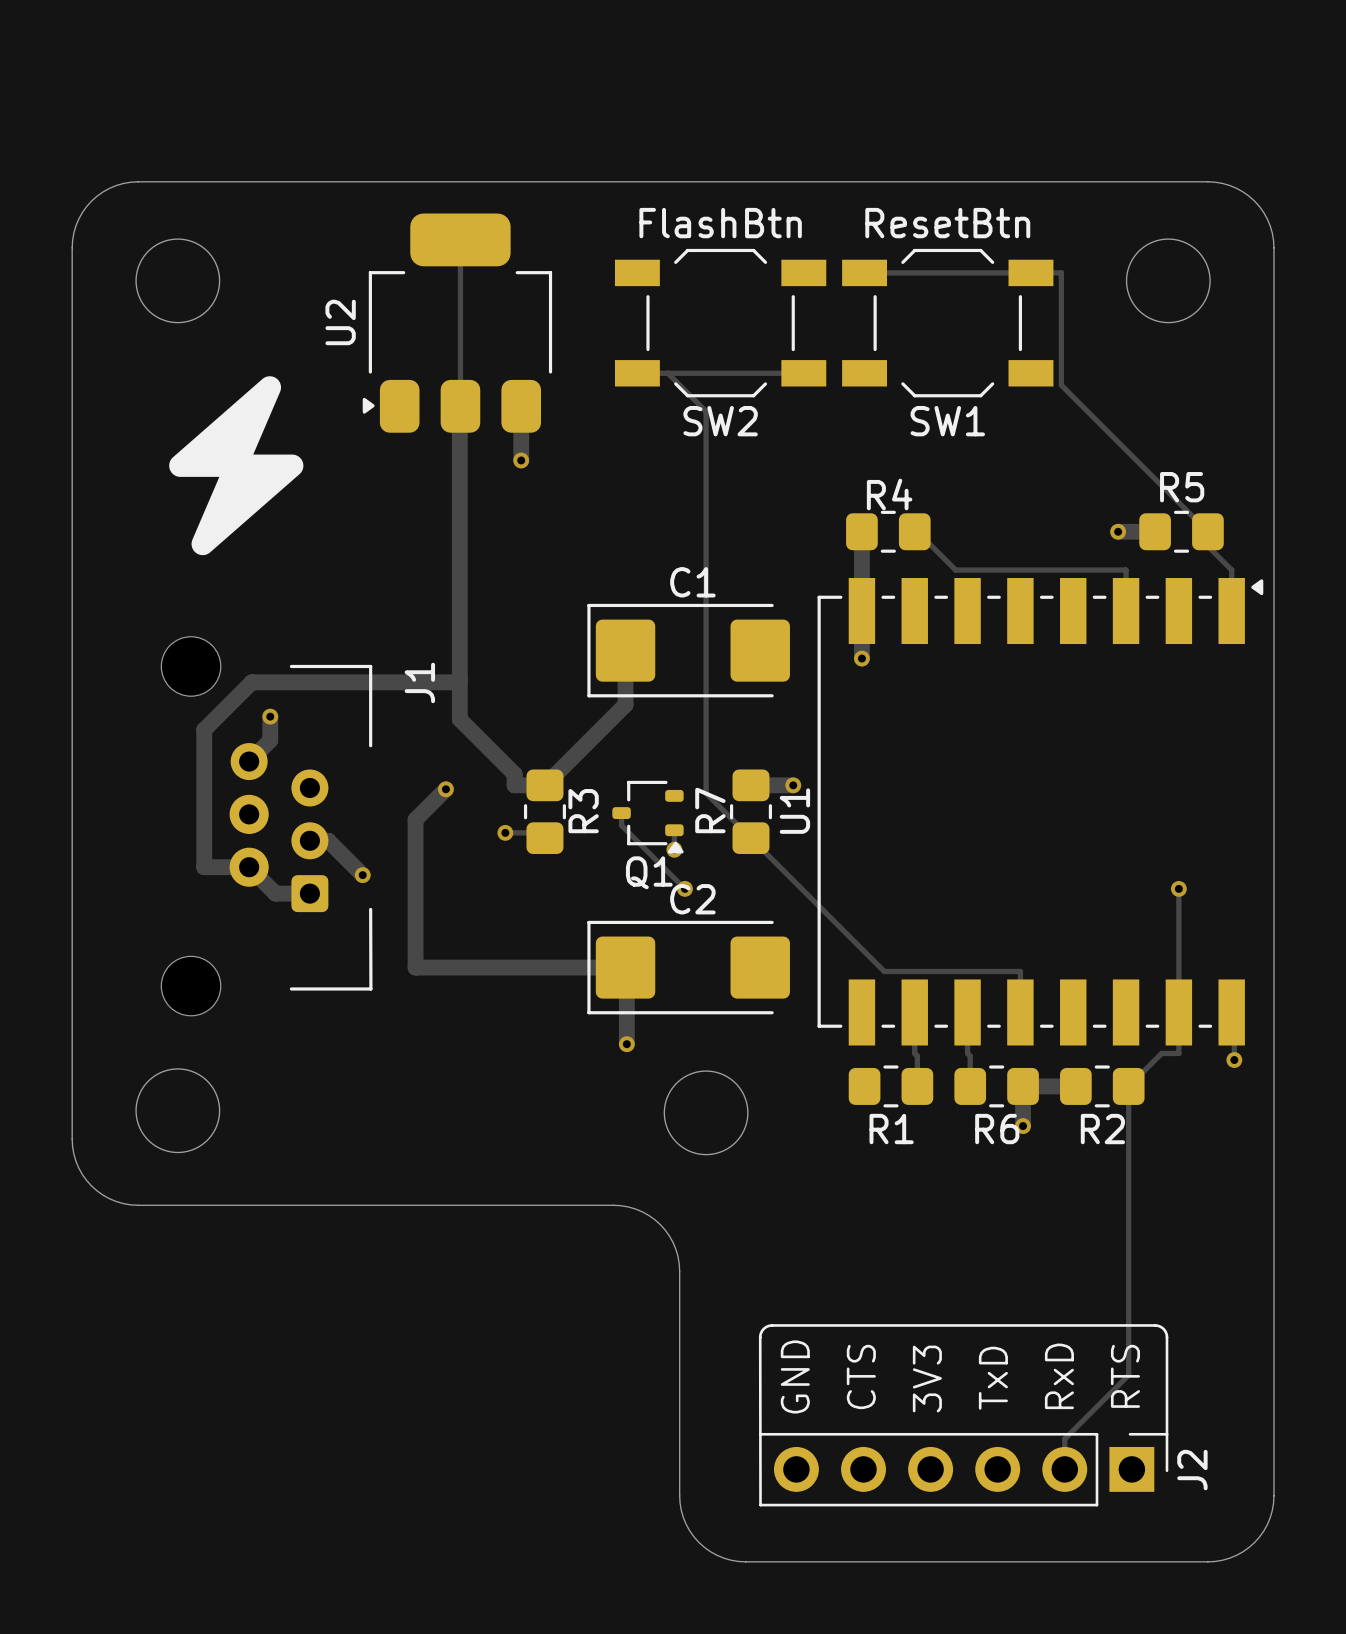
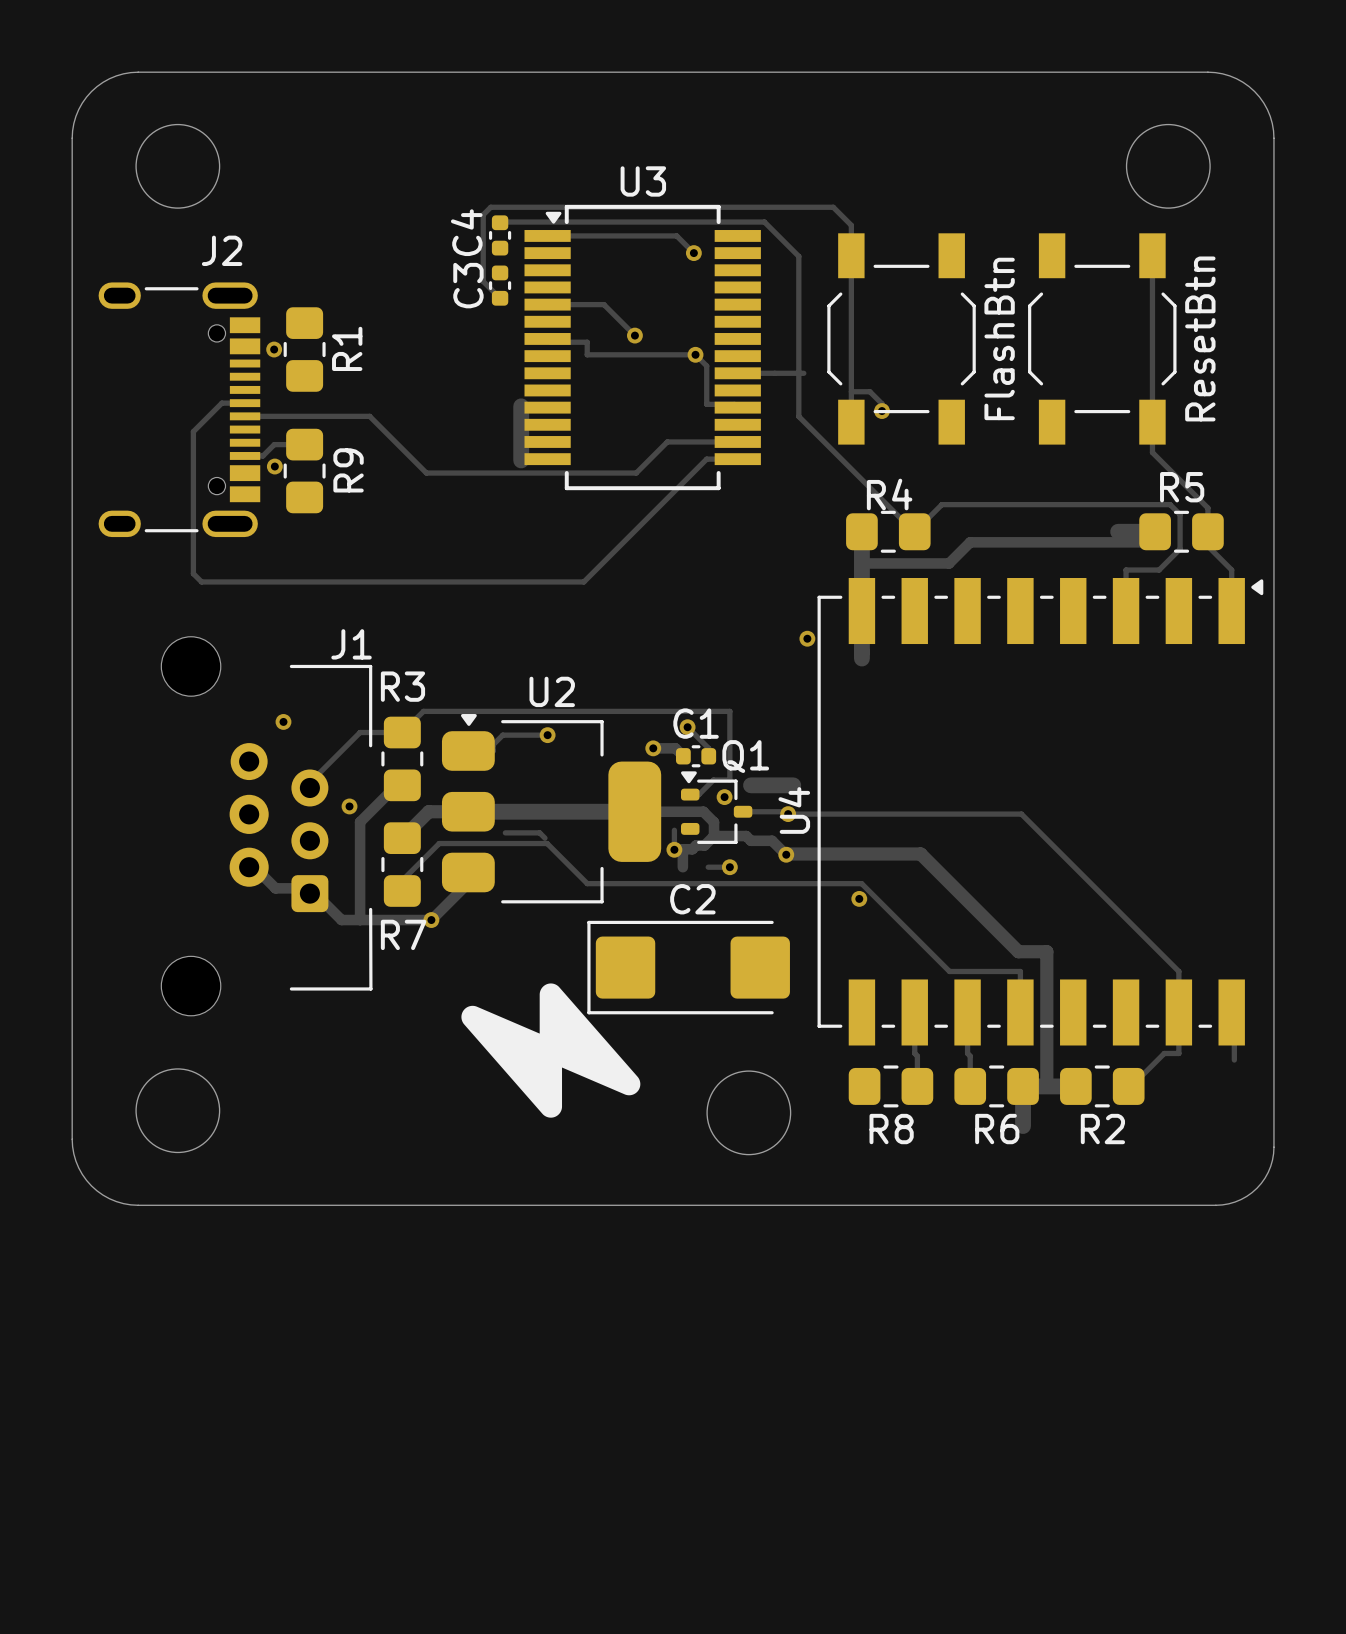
C4: none -> (500, 235)
track: none -> (547, 235) (676, 235) (693, 253)
track: (460, 239) (459, 719) (514, 774) (514, 785) (544, 785) (625, 704) (625, 650) -> none
board edge: (72, 247) (73, 233) (78, 219) (91, 201) (109, 188) (123, 183) (138, 181) (1215, 182) (1236, 188) (1254, 201) (1267, 219) (1272, 233) (1273, 247) -> (72, 247) (72, 138) (75, 116) (86, 97) (97, 86) (116, 75) (138, 72) (1215, 72) (1229, 75) (1249, 86) (1263, 103) (1270, 116) (1273, 138) (1273, 247)
via: none -> (693, 253)
track: (864, 272) (1061, 272) (1061, 385) (1207, 531) -> (1152, 255) (1152, 452) (1207, 508) (1207, 531)
round board edge position: (177, 280) -> (177, 166)
round board edge position: (1168, 280) -> (1168, 166)
C3: none -> (500, 285)
track: none -> (500, 298) (483, 281) (483, 214) (490, 207) (833, 207) (851, 225) (851, 422)
track: none -> (547, 304) (603, 304) (634, 335)
U2 rotation: 0° (457, 323) -> 90° clockwise (551, 808)
U2 position: (457, 323) -> (551, 808)
SW2: FlashBtn (720, 323) -> none
SW1: ResetBtn (947, 323) -> none
via: none -> (634, 335)
track: none -> (547, 338) (550, 342) (587, 342) (587, 354) (695, 354) (706, 366) (706, 404) (734, 404) (737, 407)
part: none -> FlashBtn (901, 338)
part: none -> ResetBtn (1102, 338)
U3: none -> (642, 347)
via: none -> (274, 349)
R1: none -> (304, 349)
via: none -> (695, 354)
track: (637, 373) (737, 373) -> none
track: (667, 373) (706, 411) (706, 793) (884, 971) (949, 971) -> (402, 890) (402, 880) (439, 843) (547, 843) (587, 883) (861, 883) (949, 971)
drawing: [169, 376, 304, 556] -> none
track: none -> (851, 391) (869, 391) (882, 403) (882, 411)
track: none -> (245, 403) (221, 403) (193, 431) (193, 573) (201, 581) (583, 581) (706, 459) (737, 459)
via: none -> (882, 411)
track: none -> (245, 416) (369, 416) (426, 473) (636, 473) (667, 441) (737, 441)
track: none -> (304, 444) (274, 444) (262, 455) (245, 455)
via: (521, 460) -> none
via: none -> (274, 466)
R9: none -> (304, 471)
track: (917, 531) (955, 570) (1126, 570) -> (500, 222) (764, 222) (798, 256) (798, 416) (914, 531) (941, 504) (1170, 504) (1180, 514) (1180, 549) (1159, 570) (1126, 570)
via: (1118, 531) -> none
track: none -> (1155, 531) (1144, 542) (970, 542) (949, 563) (861, 563)
C1 footprint: [587, 603, 790, 698] -> [675, 745, 717, 768]
via position: (861, 658) -> (807, 638)
track: (459, 679) (457, 682) (251, 682) (204, 729) (204, 867) (249, 867) (275, 893) (309, 893) -> none
J1 name rotation: 0° (419, 682) -> 90° clockwise (351, 644)
J1 name position: J1 (419, 682) -> J1 (351, 644)
track: (270, 716) (270, 740) (249, 761) -> none
via position: (270, 716) -> (283, 721)
track: none -> (687, 727) (708, 748) (708, 756)
via: none -> (687, 727)
track: none -> (547, 735) (502, 735) (493, 744) (493, 750) (468, 750)
via: none -> (547, 735)
track: none -> (653, 748) (675, 748) (683, 756) (678, 751)
via: none -> (653, 748)
track: none -> (406, 781) (402, 785) (396, 785) (360, 822) (360, 920)
track: none -> (309, 782) (360, 732) (402, 732) (423, 711) (729, 711) (729, 780) (713, 780) (698, 794) (690, 794)
via position: (793, 785) -> (788, 814)
track: (445, 789) (415, 819) (415, 967) (625, 967) (626, 1044) -> none
via: (445, 789) -> none
via: none -> (724, 797)
via: none -> (349, 806)
R7 name rotation: 0° (710, 810) -> 90° clockwise (403, 934)
R7 name position: R7 (710, 810) -> R7 (403, 934)
R3 position: (544, 811) -> (402, 758)
R3 name rotation: 0° (583, 811) -> 90° clockwise (402, 686)
R3 name position: R3 (583, 811) -> R3 (402, 686)
R7 position: (750, 811) -> (402, 864)
U1 name: U1 (794, 811) -> U4 (794, 810)
track: (621, 813) (621, 825) (684, 888) -> none
Q1 rotation: 0° (647, 817) -> 180° (716, 807)
Q1 position: (647, 817) -> (716, 807)
via: (505, 832) -> none
track: none -> (714, 836) (704, 845) (696, 845) (692, 849) (682, 849) (682, 867)
track: none -> (714, 836) (714, 822) (703, 811) (428, 811) (402, 838)
track: none -> (714, 836) (746, 836) (750, 840) (772, 840) (786, 854) (920, 854) (1018, 951) (1046, 951) (1046, 1081) (1042, 1086)
track: (309, 840) (328, 840) (362, 875) -> none
via: none -> (786, 854)
track: none -> (249, 861) (275, 888) (309, 888) (341, 920) (431, 920) (468, 883) (468, 872)
track: none -> (708, 867) (729, 867)
via: none -> (729, 867)
via: (362, 875) -> none
via: (684, 888) -> none
track: (1178, 888) (1178, 971) -> (743, 811) (785, 811) (788, 814) (1021, 814) (1178, 971)
via: (1178, 888) -> none
via: none -> (859, 898)
via: none -> (431, 920)
drawing: none -> [461, 983, 641, 1118]
via: (626, 1044) -> none
track: (1164, 1053) (1161, 1053) (1128, 1086) (1128, 1375) (1064, 1439) (1064, 1469) -> (1164, 1053) (1131, 1086)
via: (1234, 1060) -> none
round board edge position: (706, 1112) -> (748, 1112)
via: (1023, 1126) -> none
R1 name: R1 (891, 1129) -> R8 (891, 1129)
board edge: (1273, 1147) (1273, 1503) (1267, 1524) (1254, 1542) (1236, 1555) (1215, 1561) (745, 1561) (731, 1560) (710, 1551) (699, 1542) (689, 1530) (683, 1517) (680, 1503) (679, 1271) (678, 1256) (669, 1236) (654, 1219) (635, 1209) (613, 1205) -> (1273, 1147) (1270, 1166) (1261, 1183) (1241, 1199) (1222, 1204) (613, 1205)
text: GND (795, 1376) -> none
text: CTS (861, 1376) -> none
text: RxD (1059, 1376) -> none
text: RTS (1125, 1376) -> none
text: TxD (993, 1378) -> none
text: 3V3 (927, 1379) -> none
line: (760, 1434) (1097, 1434) (1097, 1505) (760, 1505) (760, 1334) (764, 1327) (772, 1325) (1156, 1325) (1163, 1328) (1166, 1335) (1166, 1470) -> none
line: (1130, 1434) (1166, 1434) -> none
J2 footprint: [773, 1446, 1155, 1492] -> [98, 282, 261, 538]
J2 name position: J2 (1192, 1470) -> J2 (222, 250)

